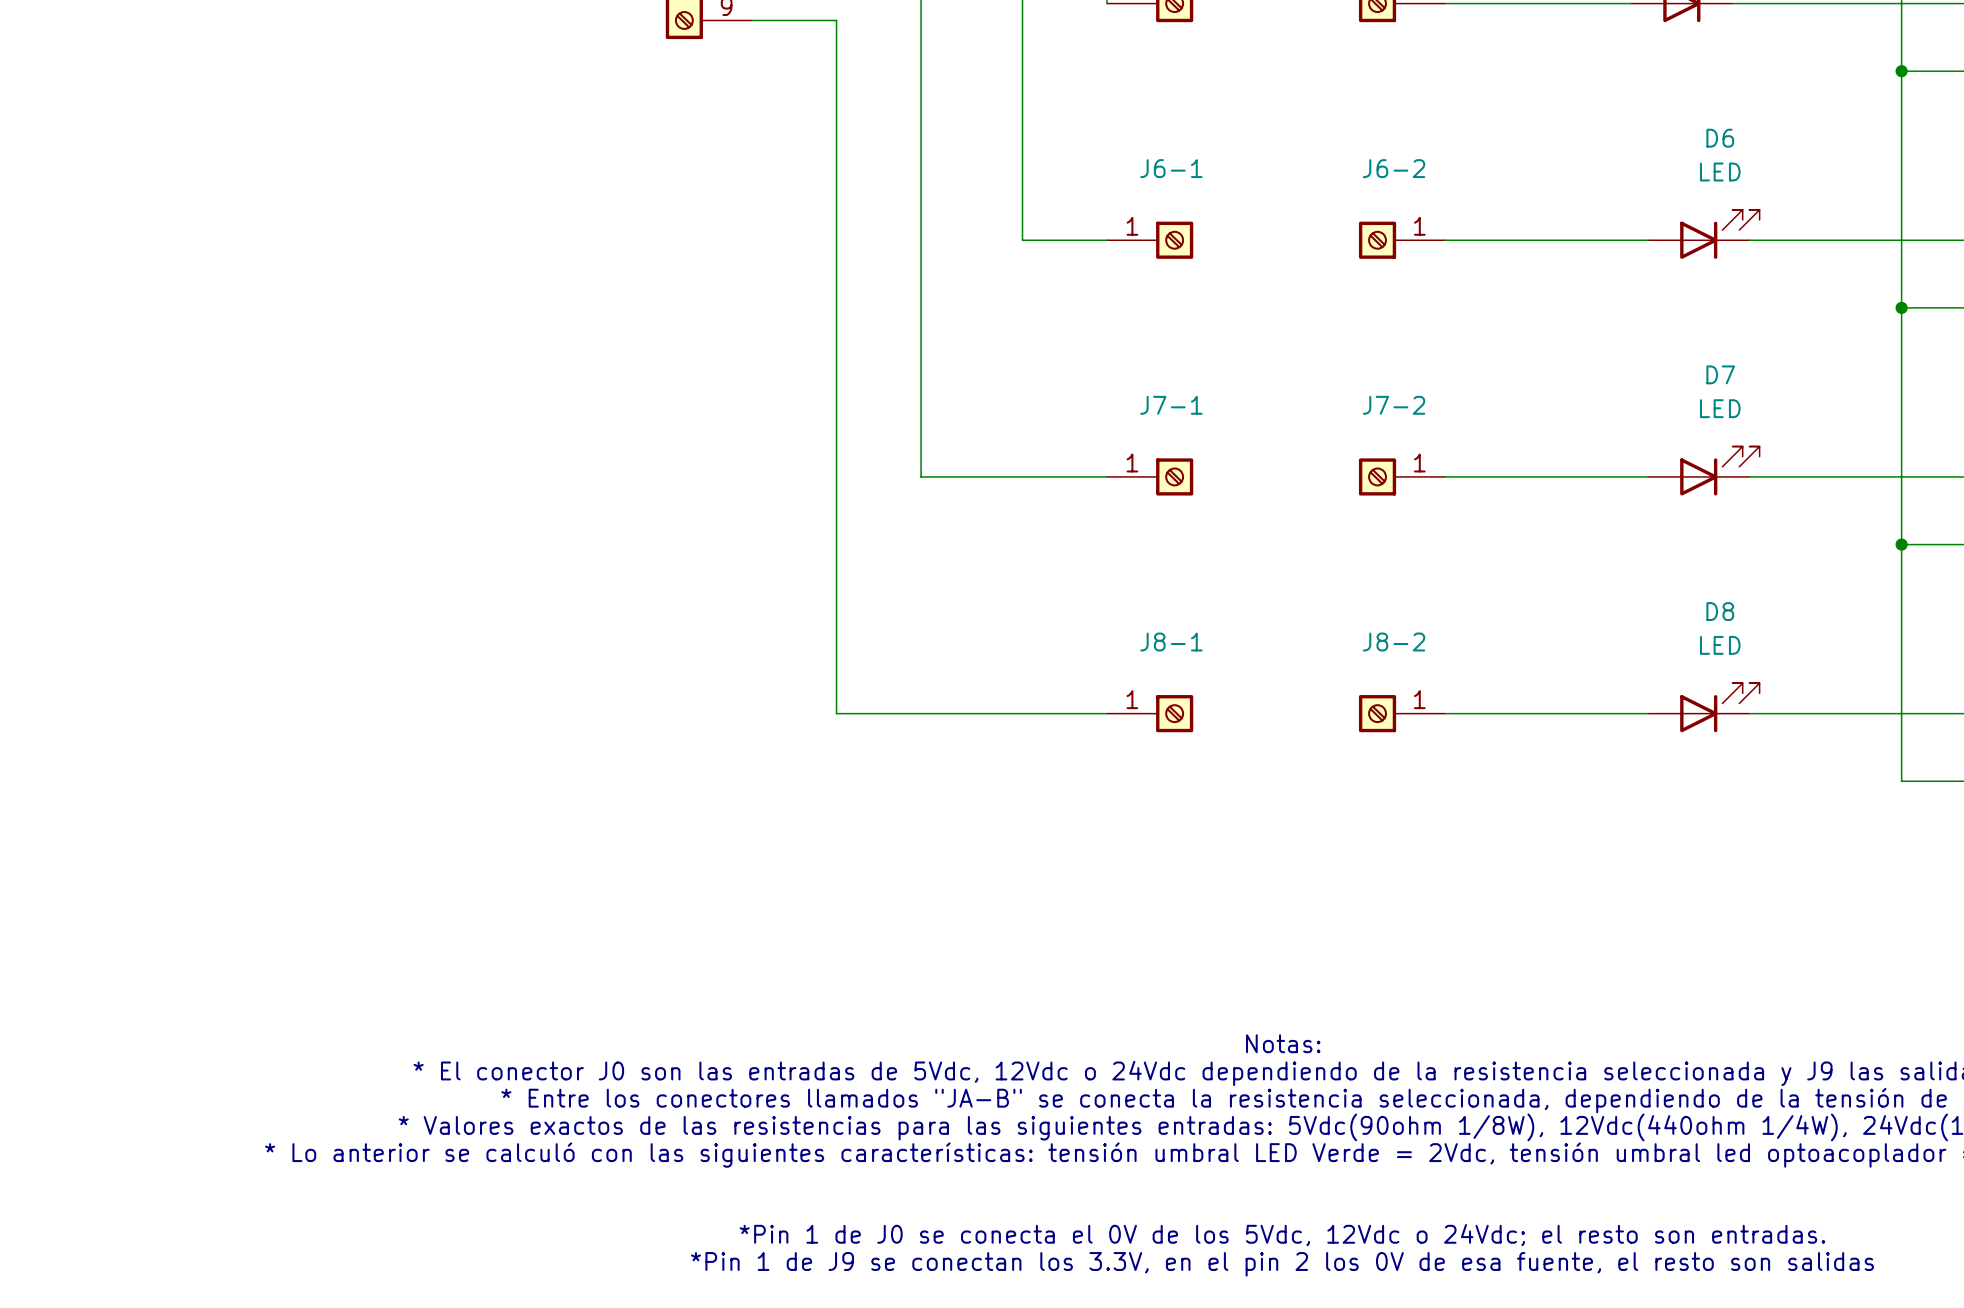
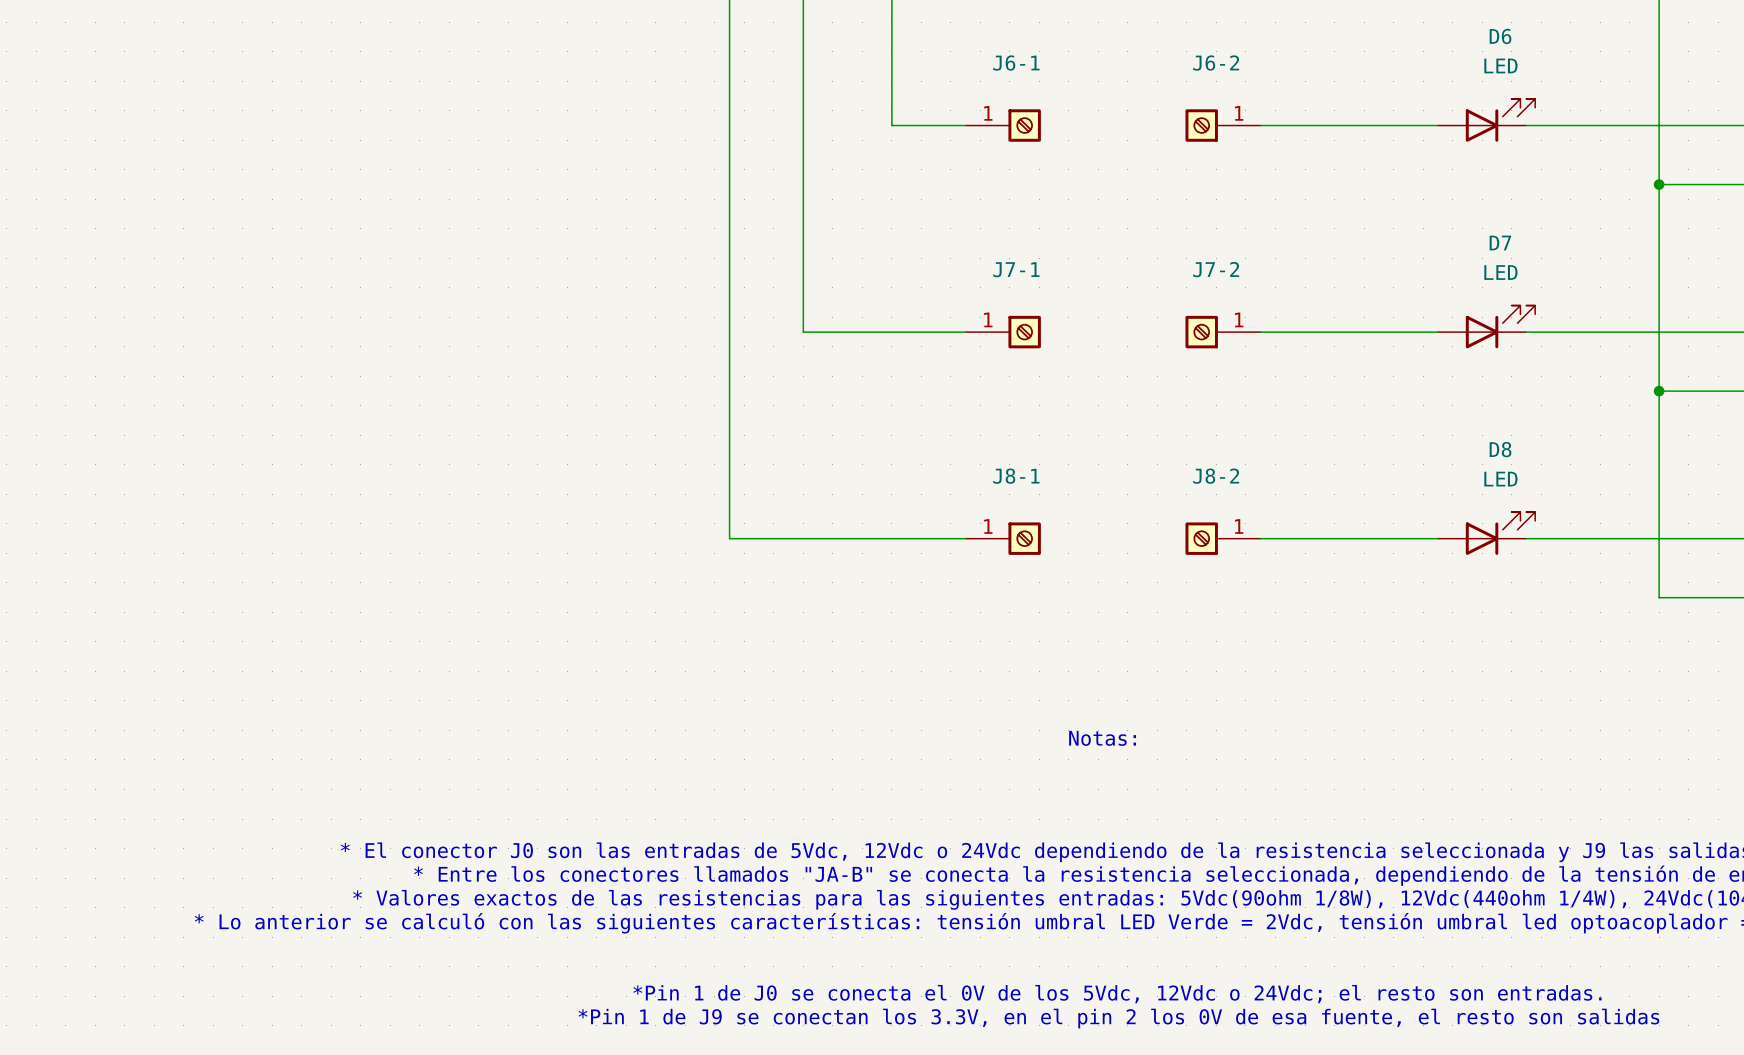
text position: Notas: (1283, 1043) -> Notas: (1102, 738)

